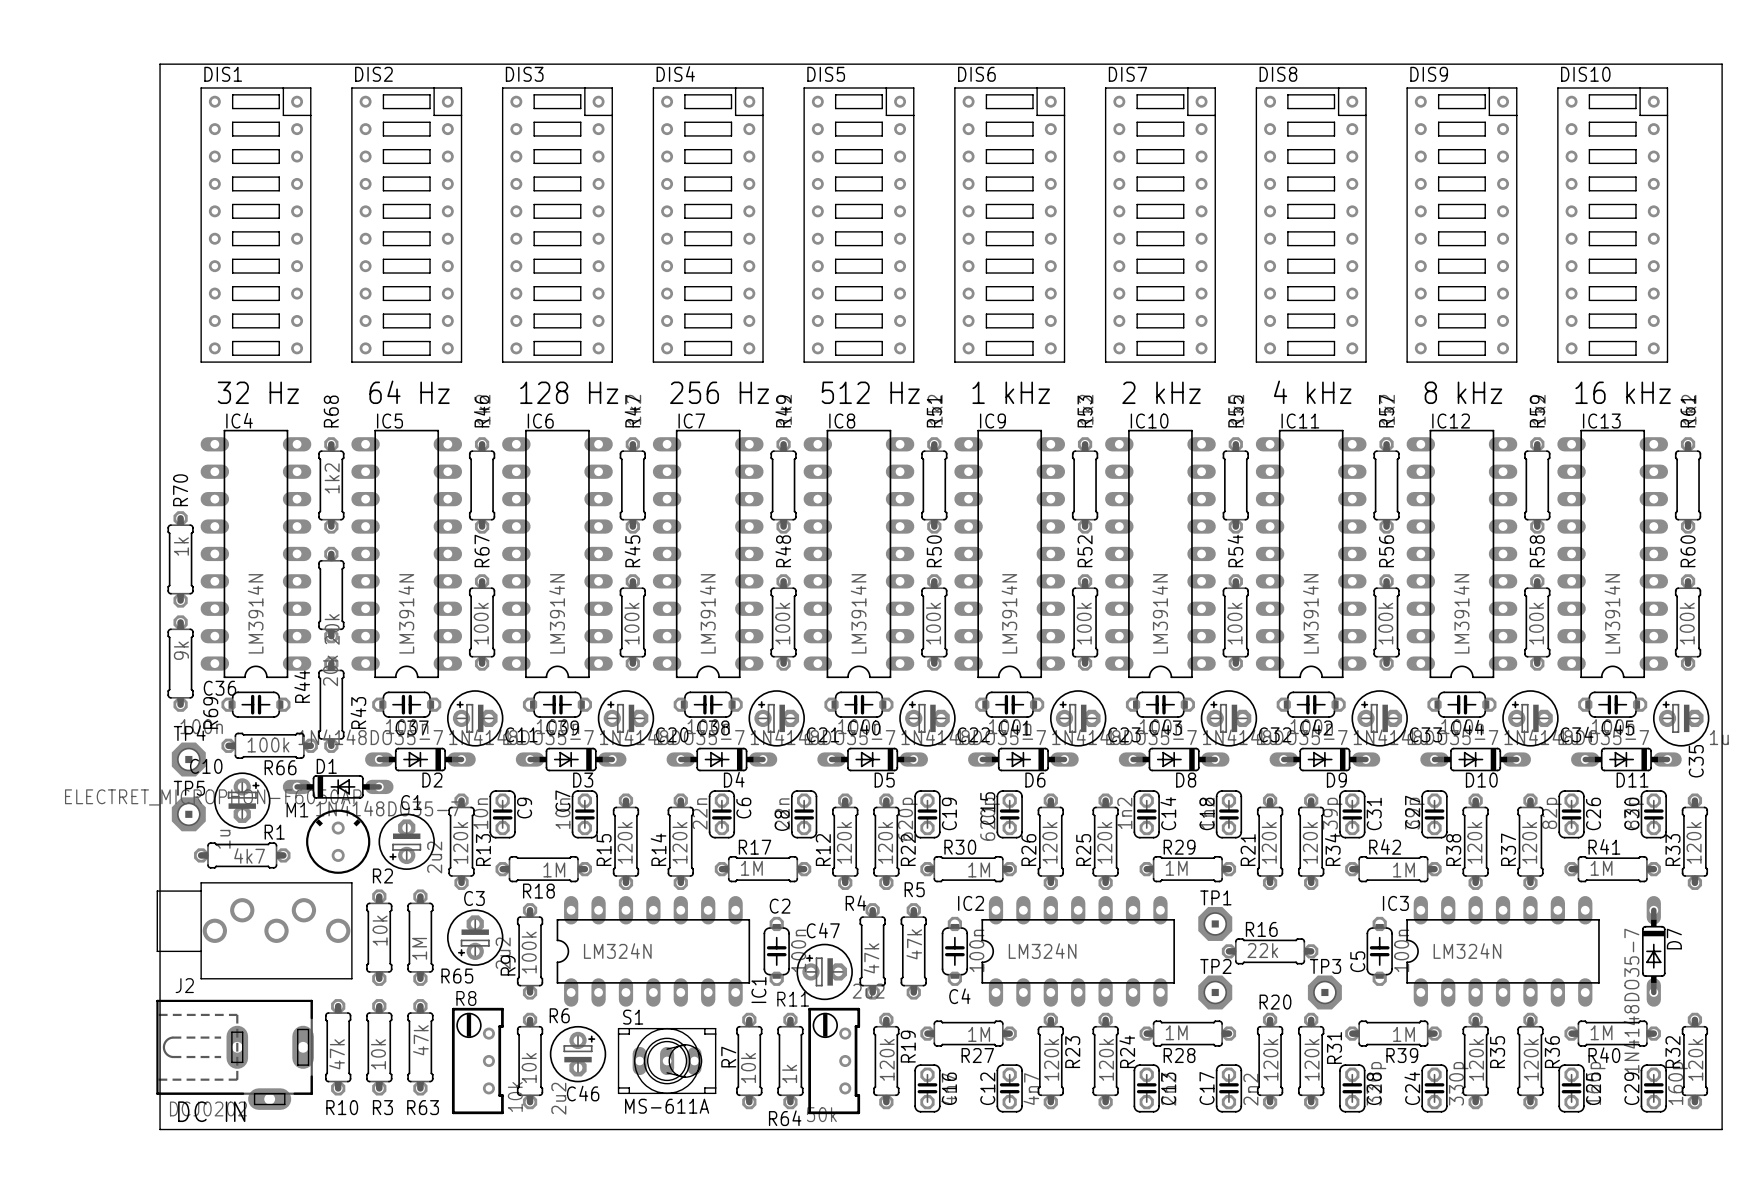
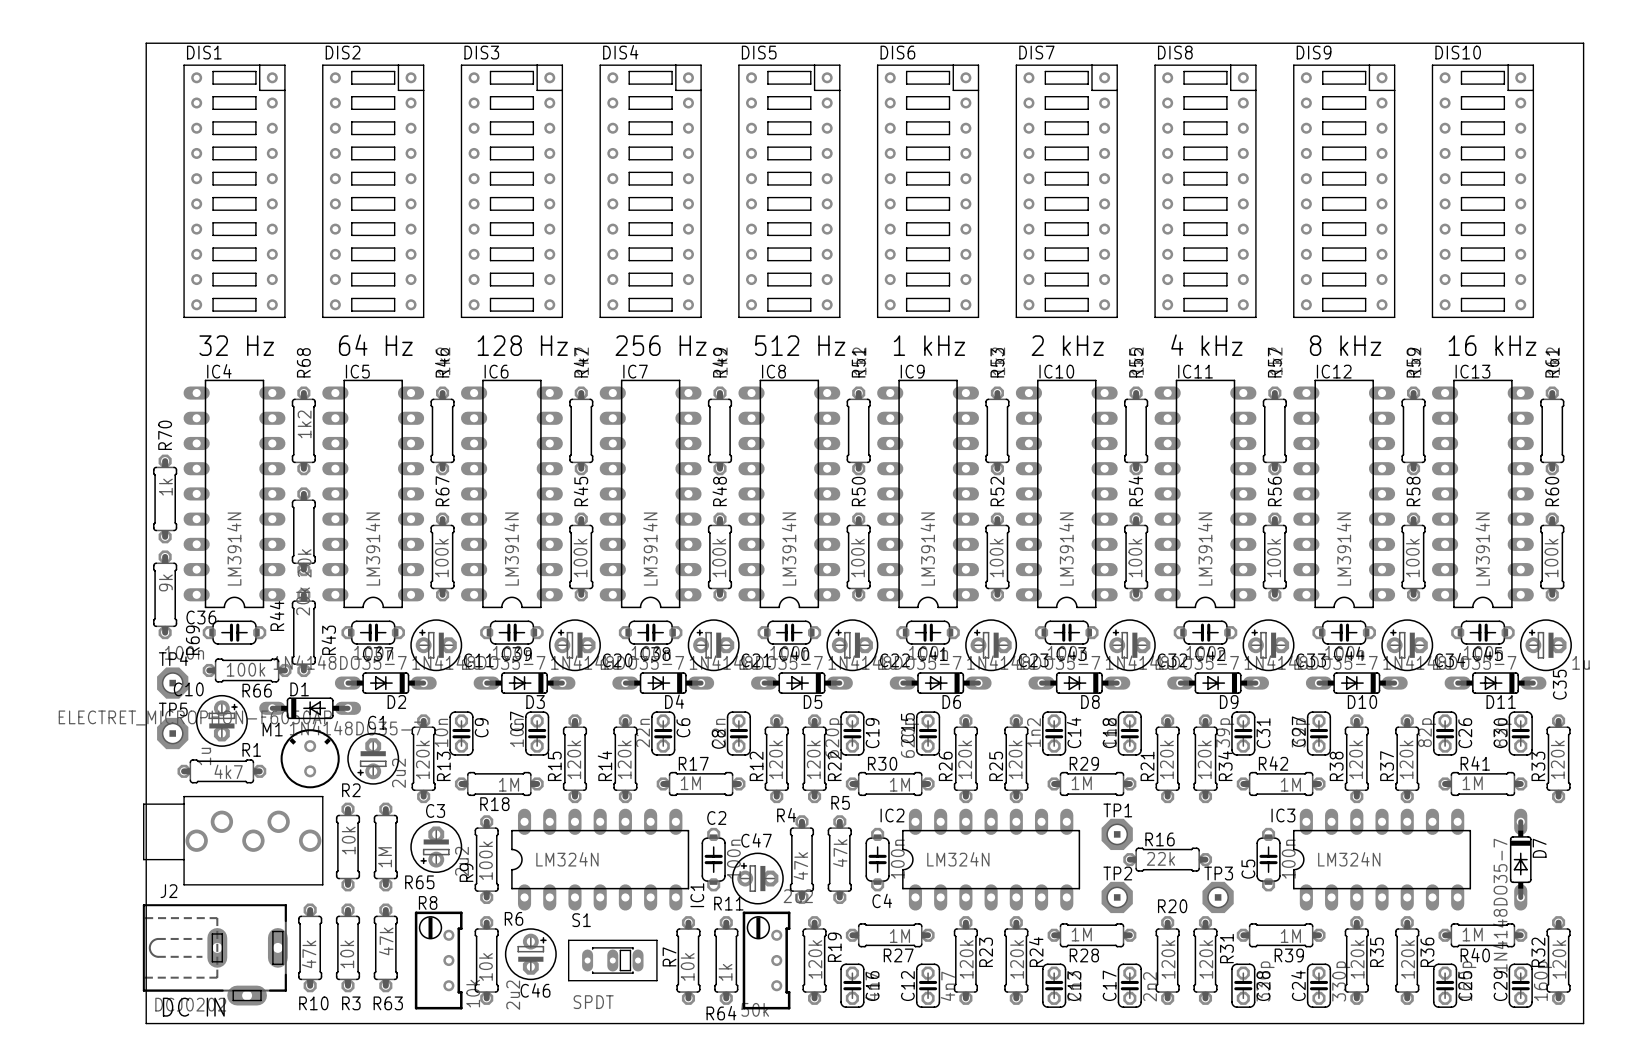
S1 footprint: [617, 1027, 717, 1095] -> [568, 939, 658, 982]
S1 value: MS-611A (667, 1106) -> SPDT (593, 1002)

